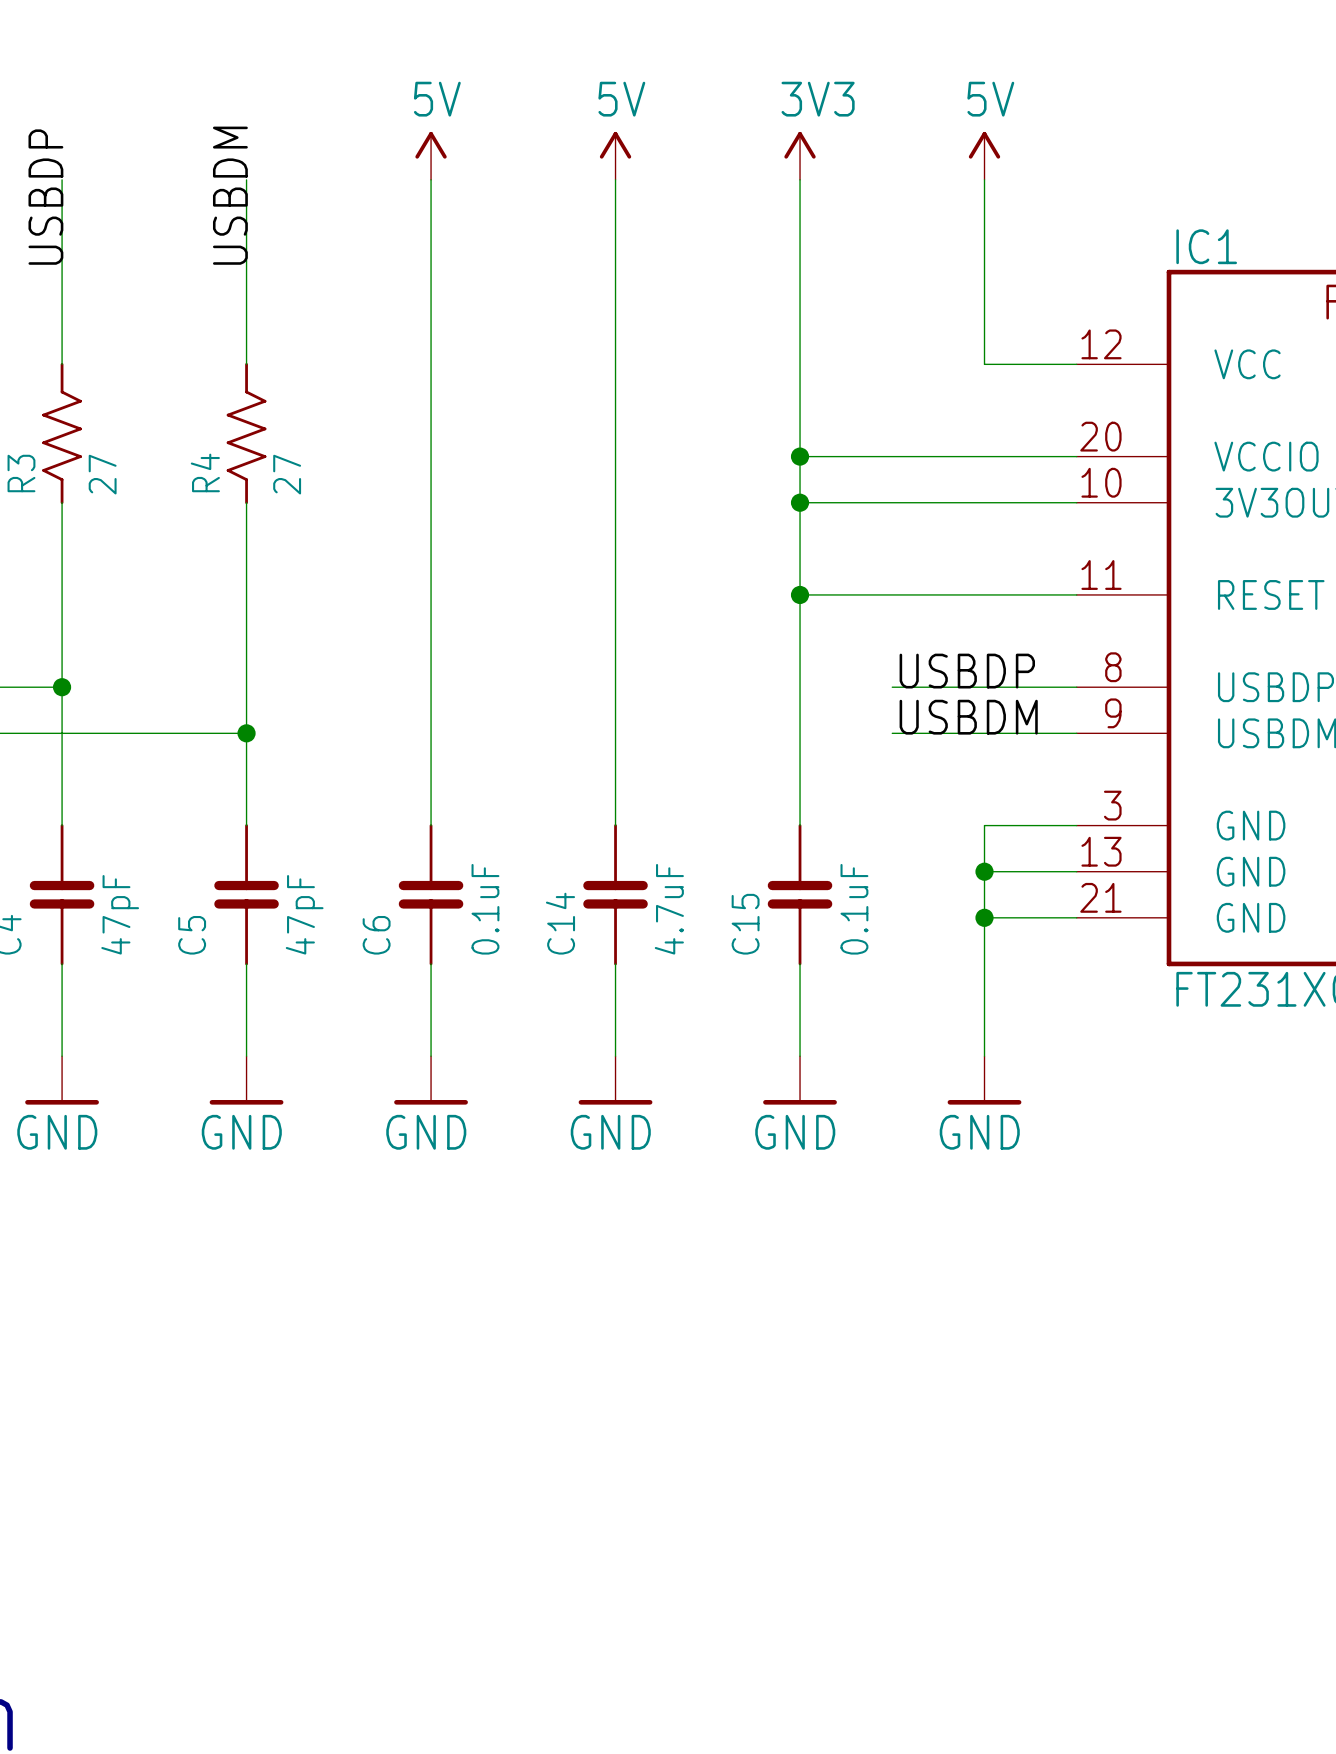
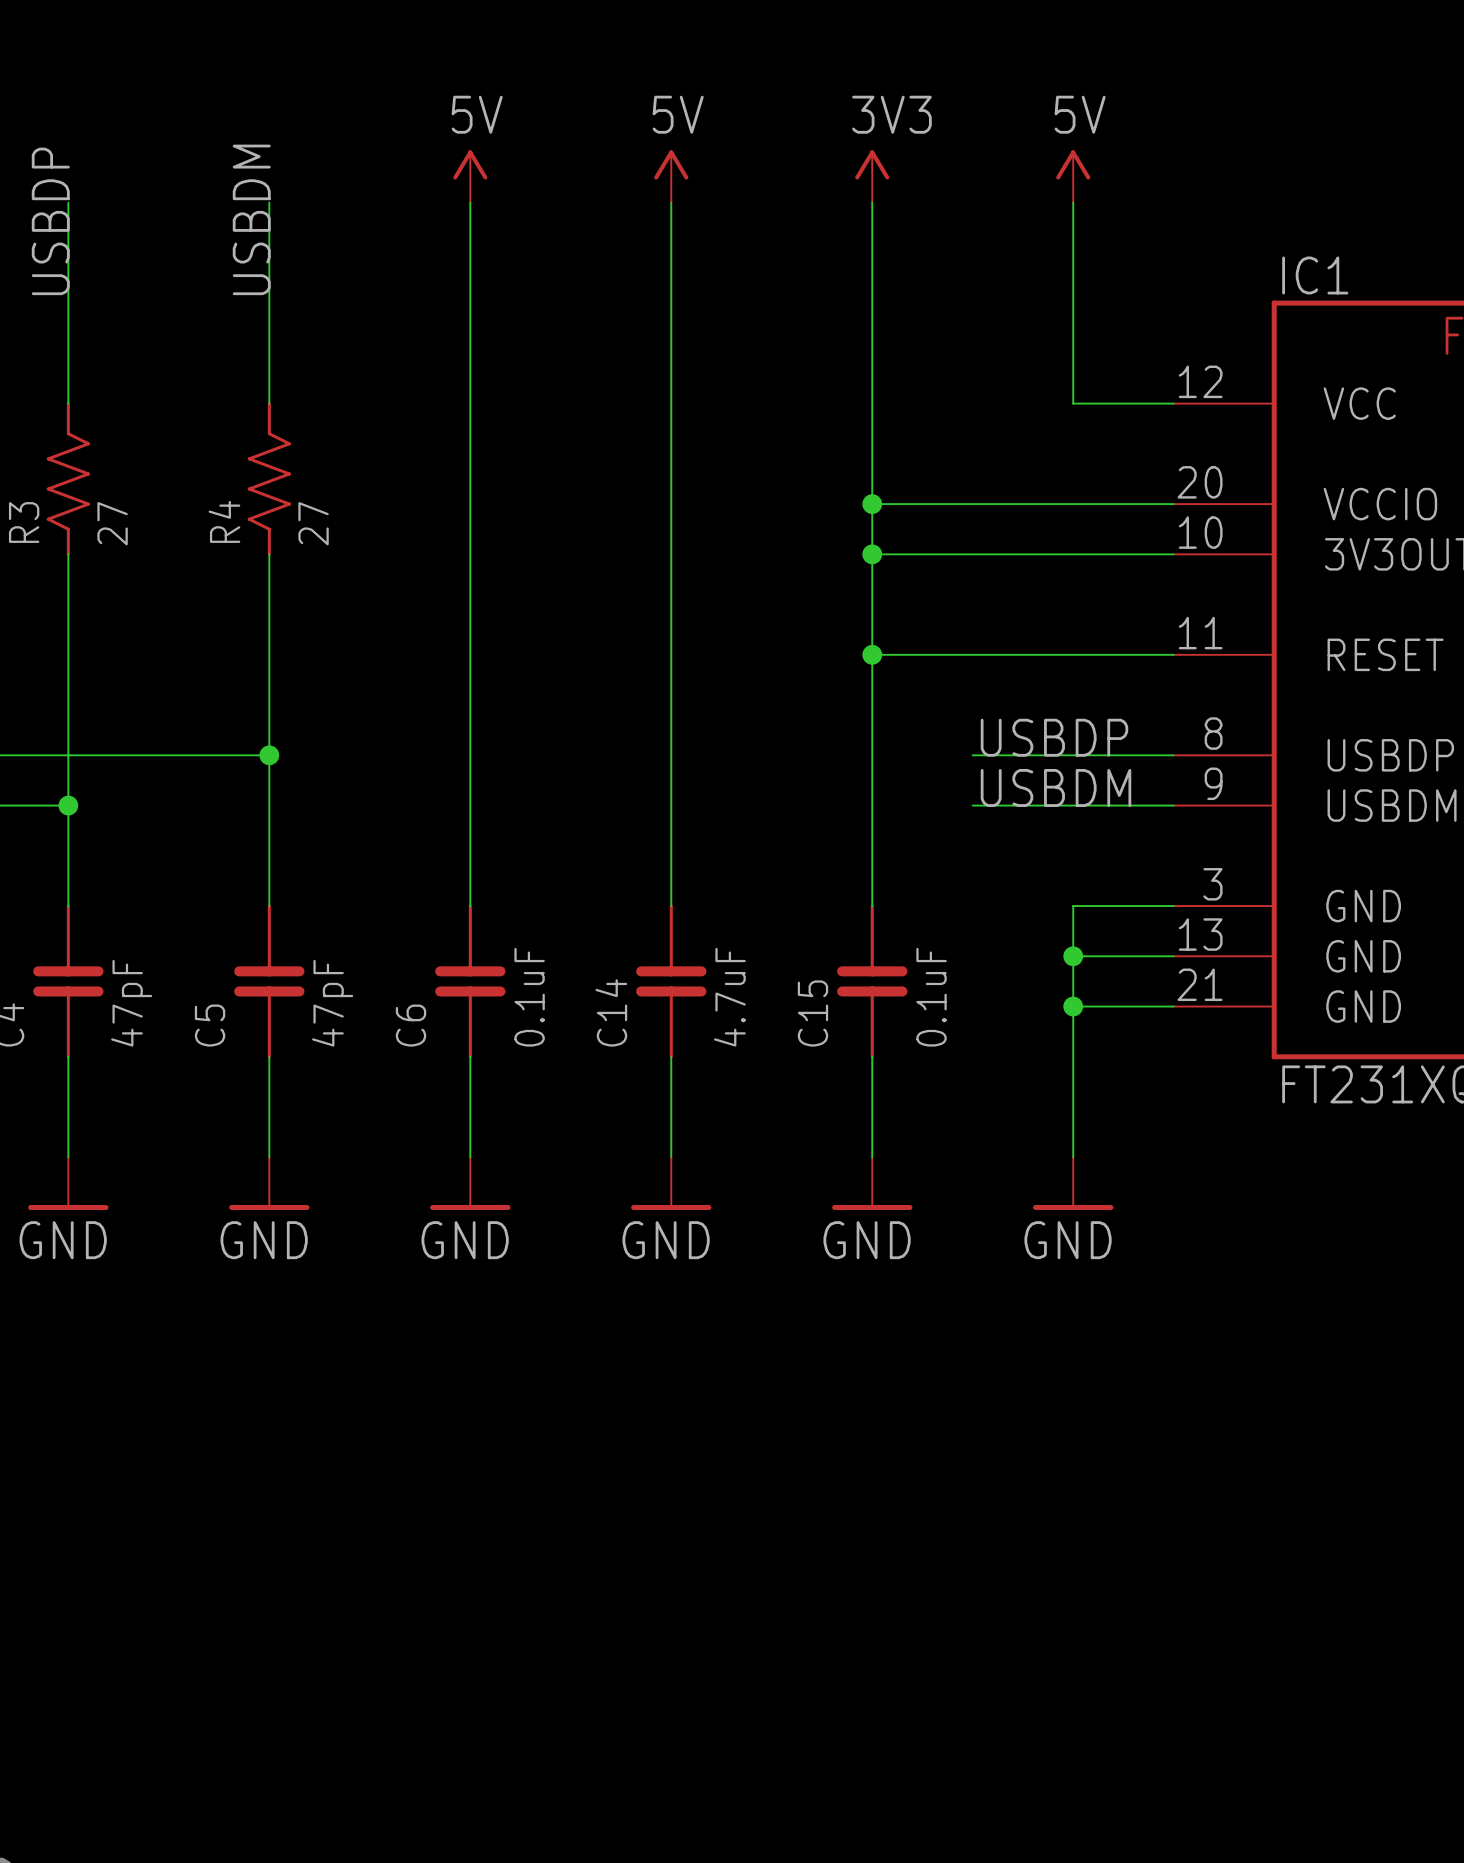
junction position: (62, 687) -> (68, 805)
wire: (62, 733) (246, 733) -> (68, 755) (269, 755)
junction position: (246, 733) -> (269, 755)

